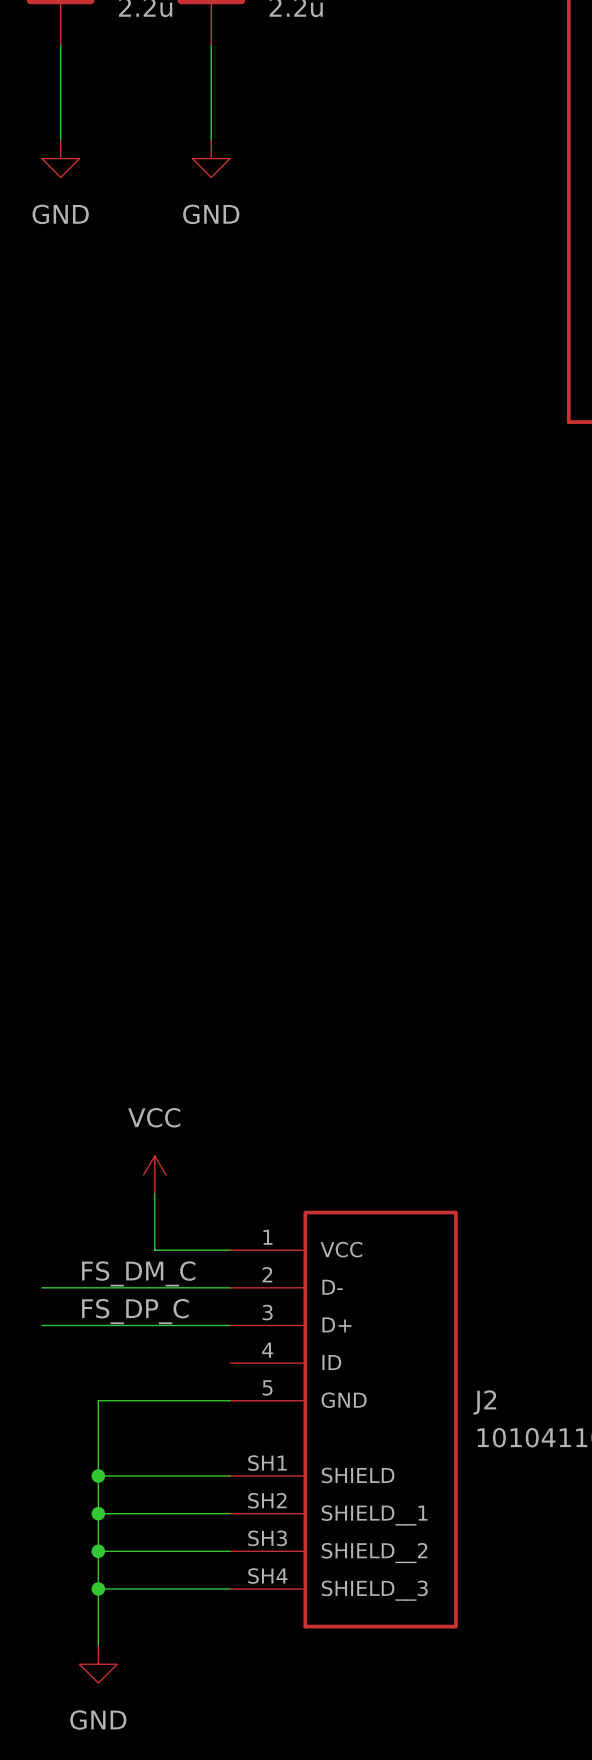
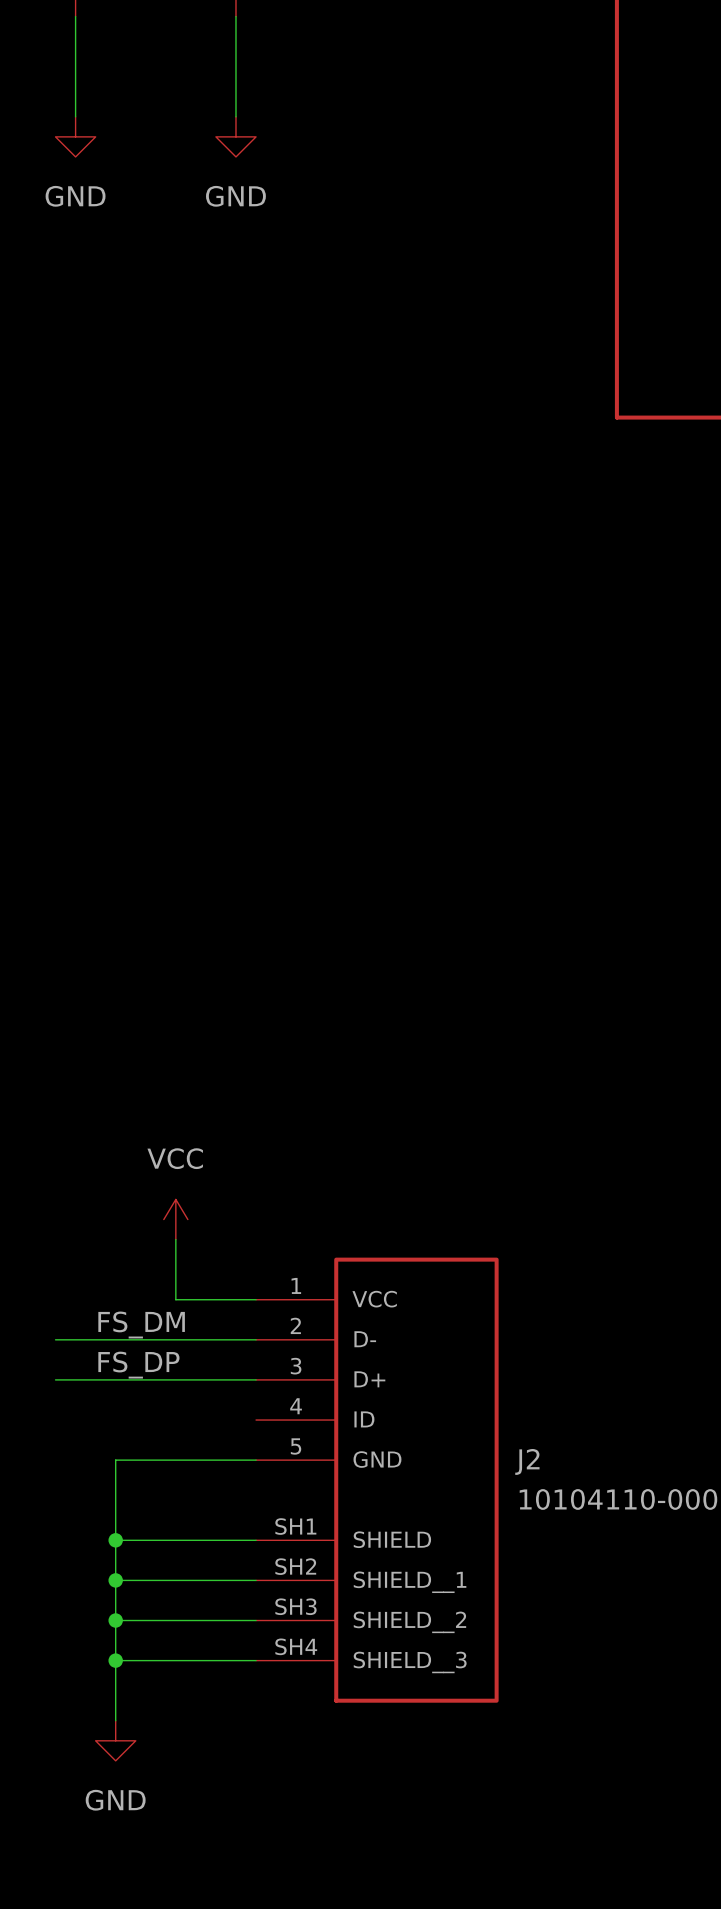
label: FS_DM_C (138, 1273) -> FS_DM (141, 1325)
label: FS_DP_C (135, 1311) -> FS_DP (138, 1365)

